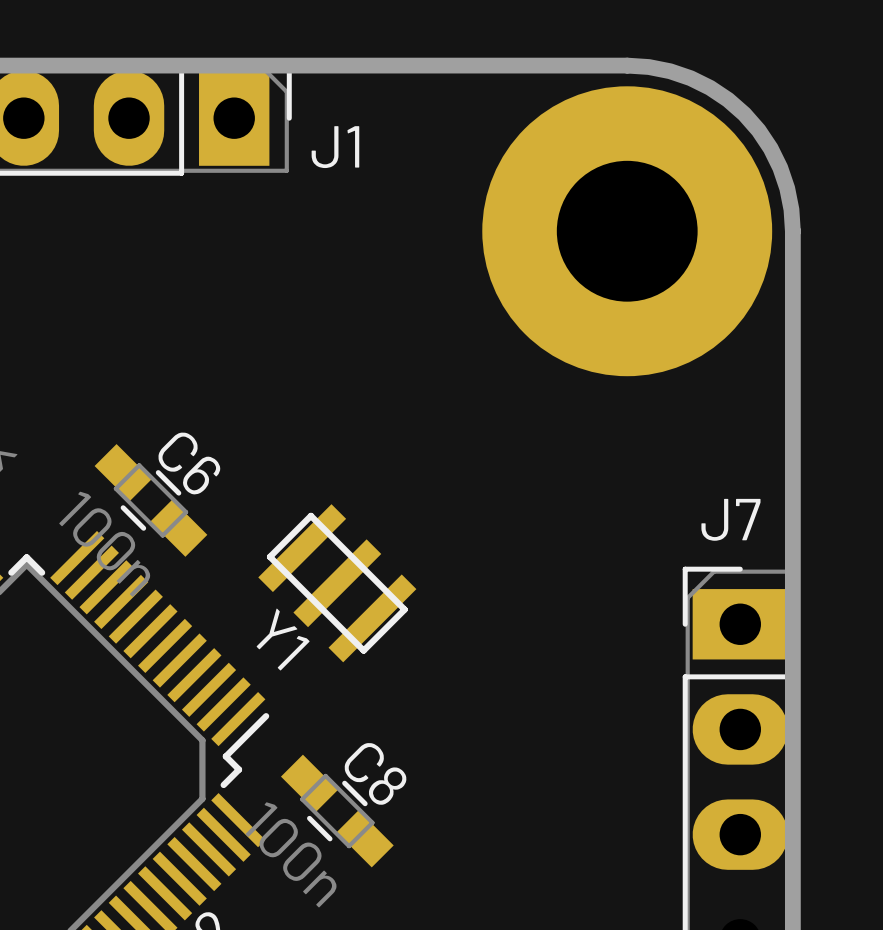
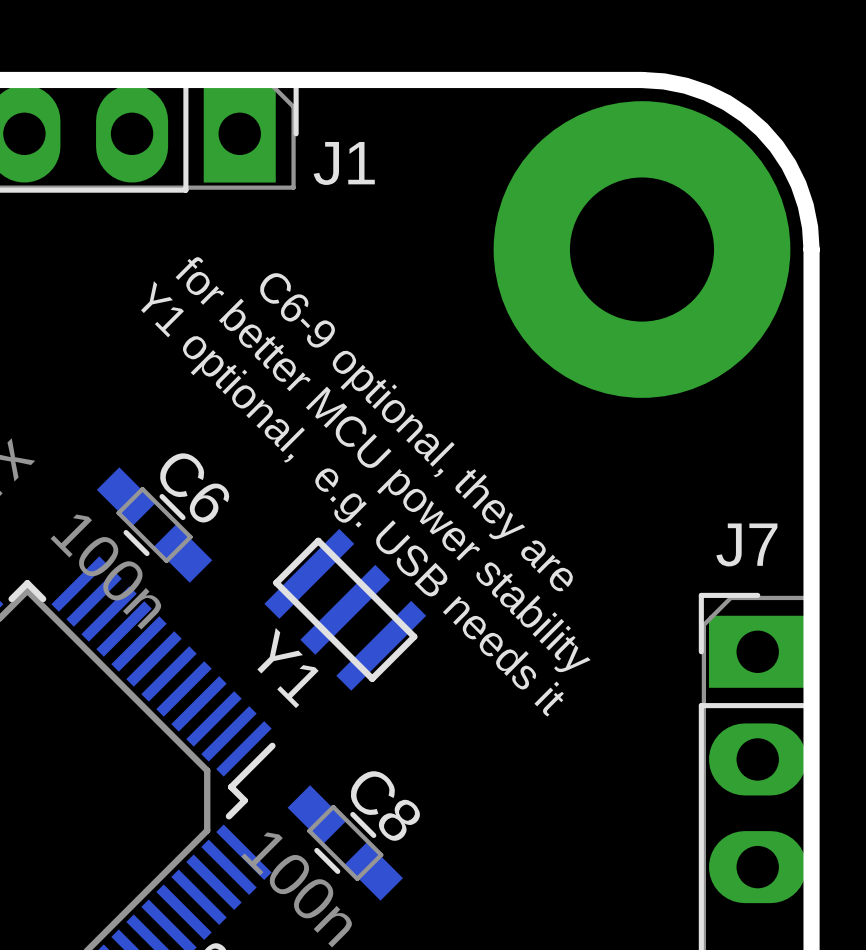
text: none -> C6-9 optional, they are (418, 433)
text: none -> for better MCU power stability (383, 464)
text: none -> Y1 optional, e.g. USB needs it (352, 498)

